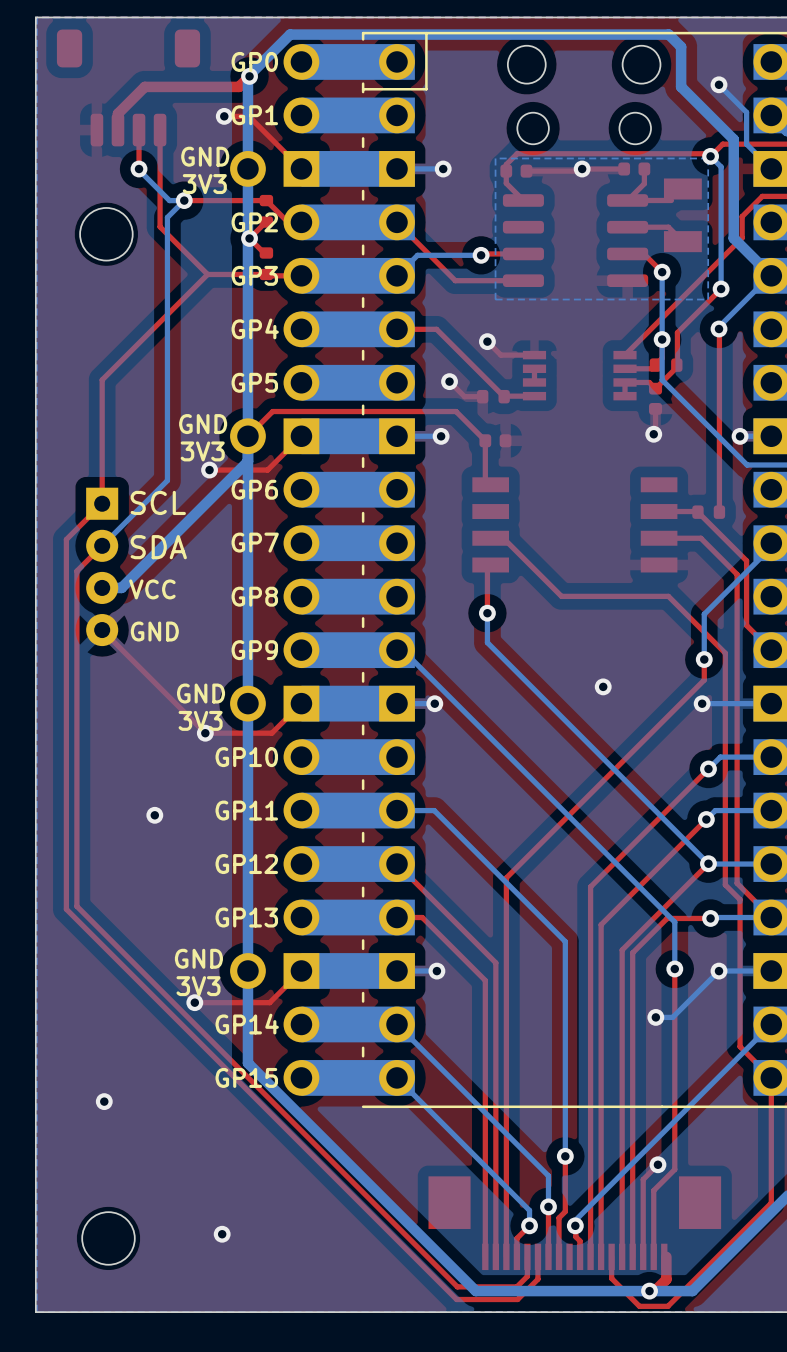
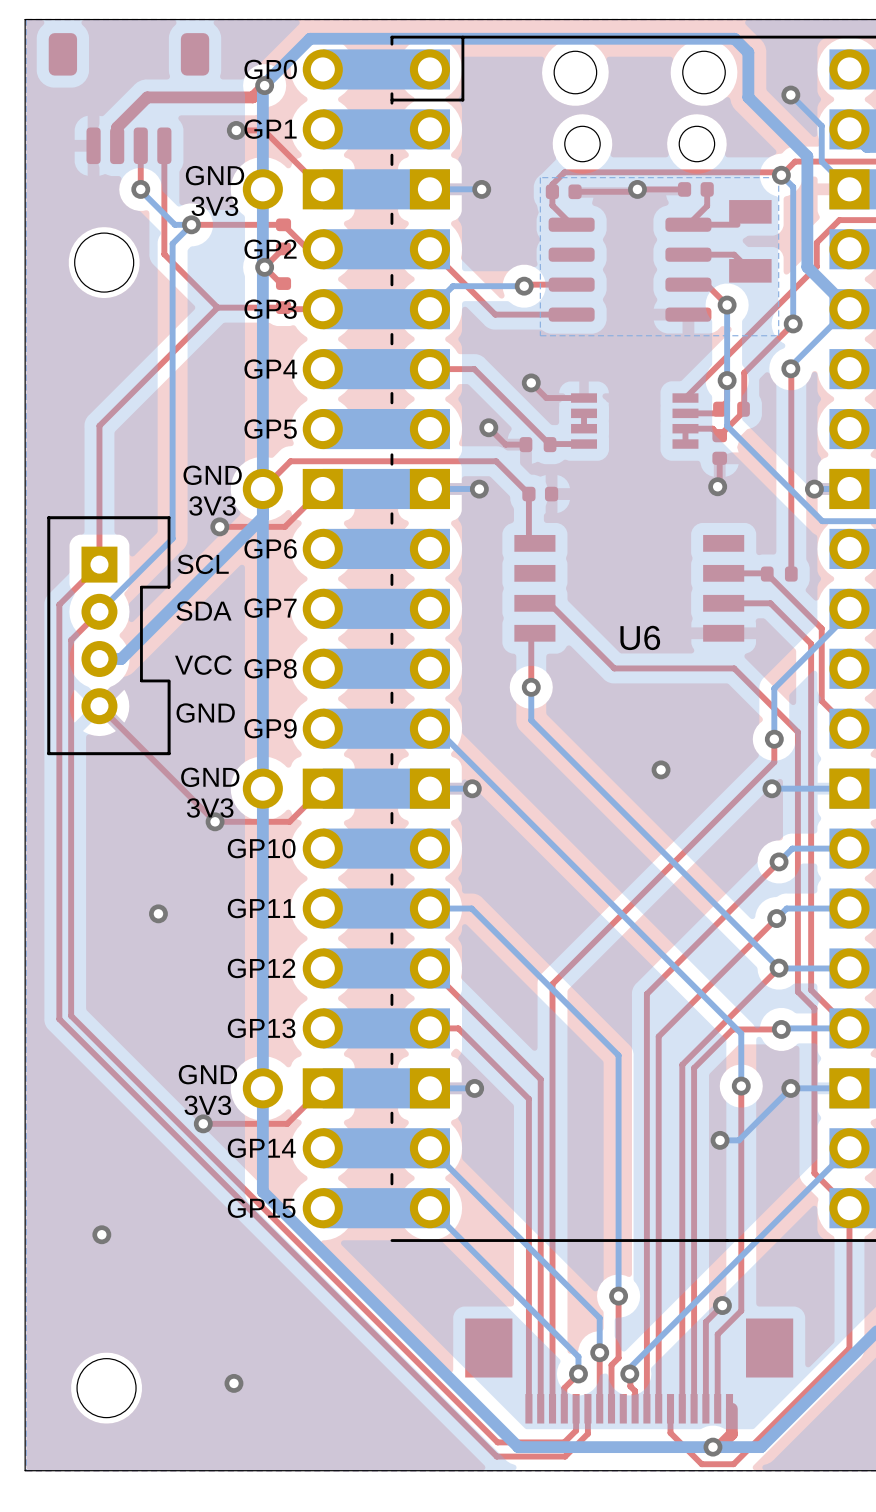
part footprint: [86, 487, 119, 647] -> [47, 516, 171, 756]
text: SCL (158, 502) -> none
text: SDA (158, 547) -> none
U6 name: none -> U6 (640, 637)
text: VCC (152, 589) -> none
text: GND (154, 631) -> none

